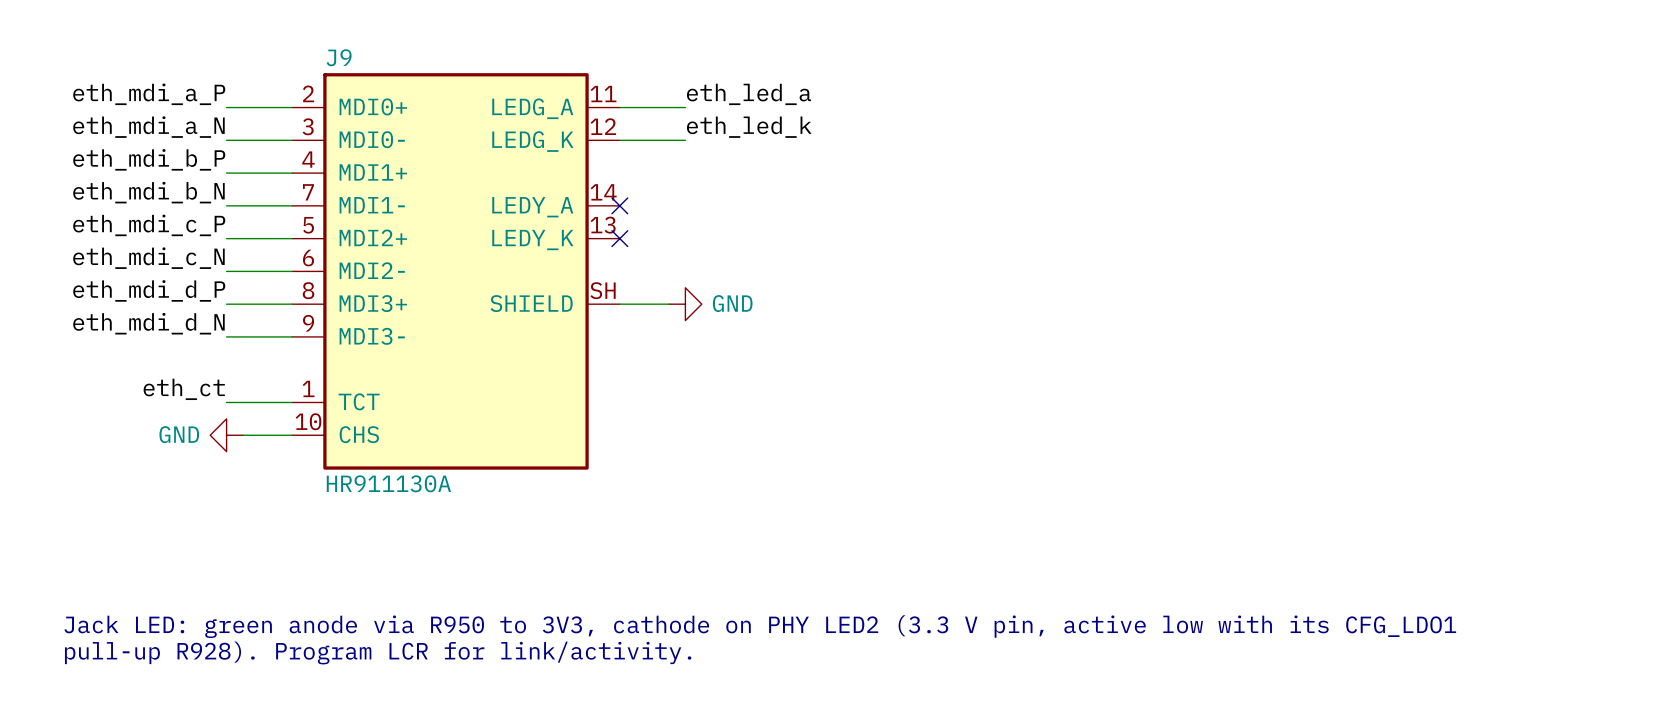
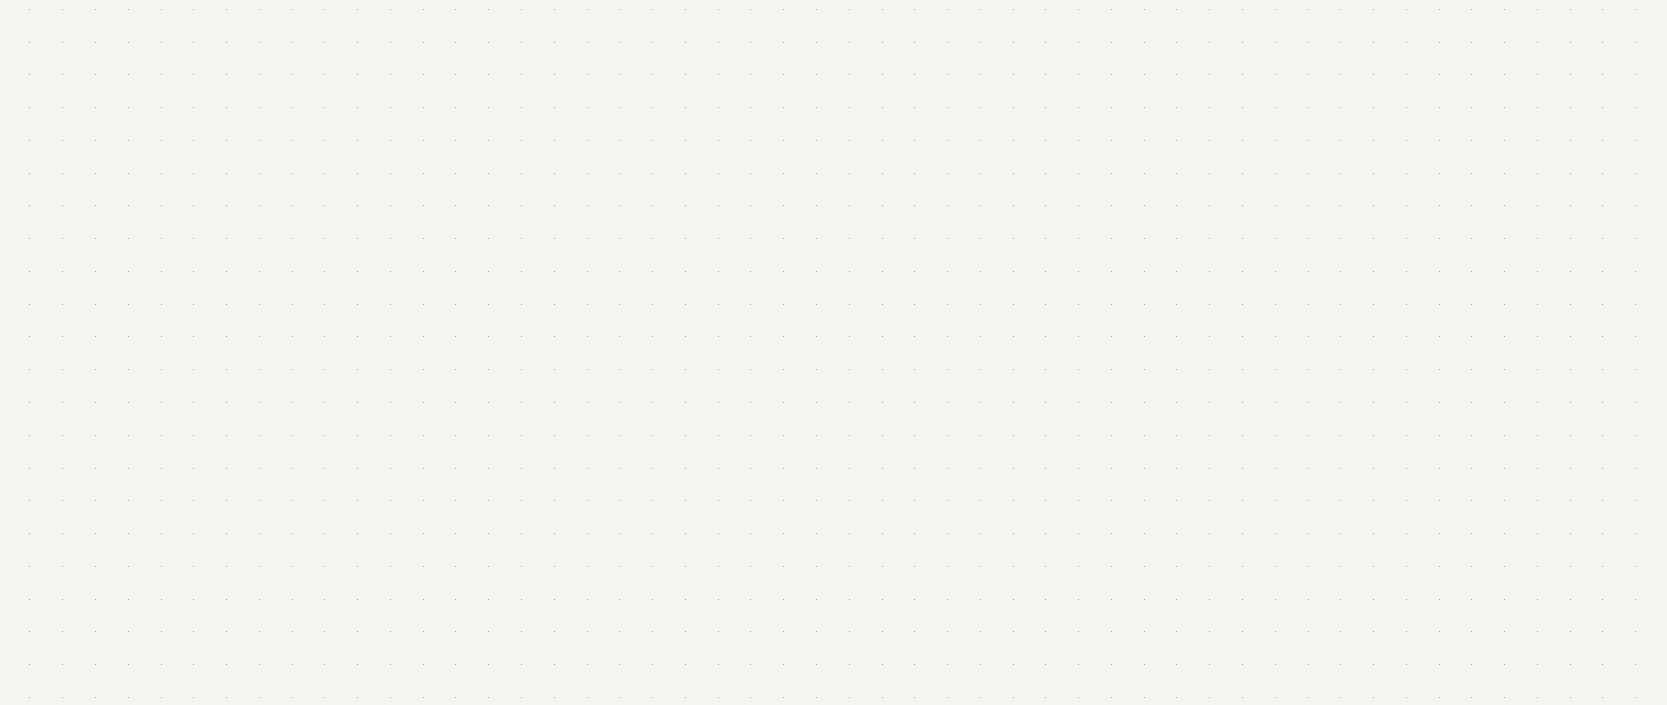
label: eth_mdi_a_P (149, 94) -> none
label: eth_led_a (748, 94) -> none
wire: (226, 107) (292, 107) -> none
wire: (619, 107) (685, 107) -> none
label: eth_mdi_a_N (148, 127) -> none
label: eth_led_k (749, 127) -> none
wire: (226, 140) (292, 140) -> none
wire: (619, 140) (685, 140) -> none
label: eth_mdi_b_P (149, 159) -> none
wire: (226, 173) (292, 173) -> none
label: eth_mdi_b_N (148, 192) -> none
wire: (226, 205) (292, 205) -> none
no-connect mark: (619, 205) -> none
label: eth_mdi_c_P (149, 225) -> none
wire: (226, 238) (292, 238) -> none
no-connect mark: (619, 238) -> none
label: eth_mdi_c_N (148, 258) -> none
wire: (226, 271) (292, 271) -> none
J9: HR911130A (455, 271) -> none
label: eth_mdi_d_P (149, 290) -> none
wire: (226, 304) (292, 304) -> none
wire: (619, 304) (669, 304) -> none
power symbol: GND (685, 304) -> none
label: eth_mdi_d_N (148, 323) -> none
wire: (226, 336) (292, 336) -> none
label: eth_ct (184, 389) -> none
wire: (226, 402) (292, 402) -> none
power symbol: GND (226, 435) -> none
wire: (242, 435) (292, 435) -> none
text: Jack LED: green anode via R950 to 3V3, cathode on PHY LED2 (3.3 V pin, active low with its CFG_LDO1 (760, 626) -> none
text: pull-up R928). Program LCR for link/activity. (378, 653) -> none

